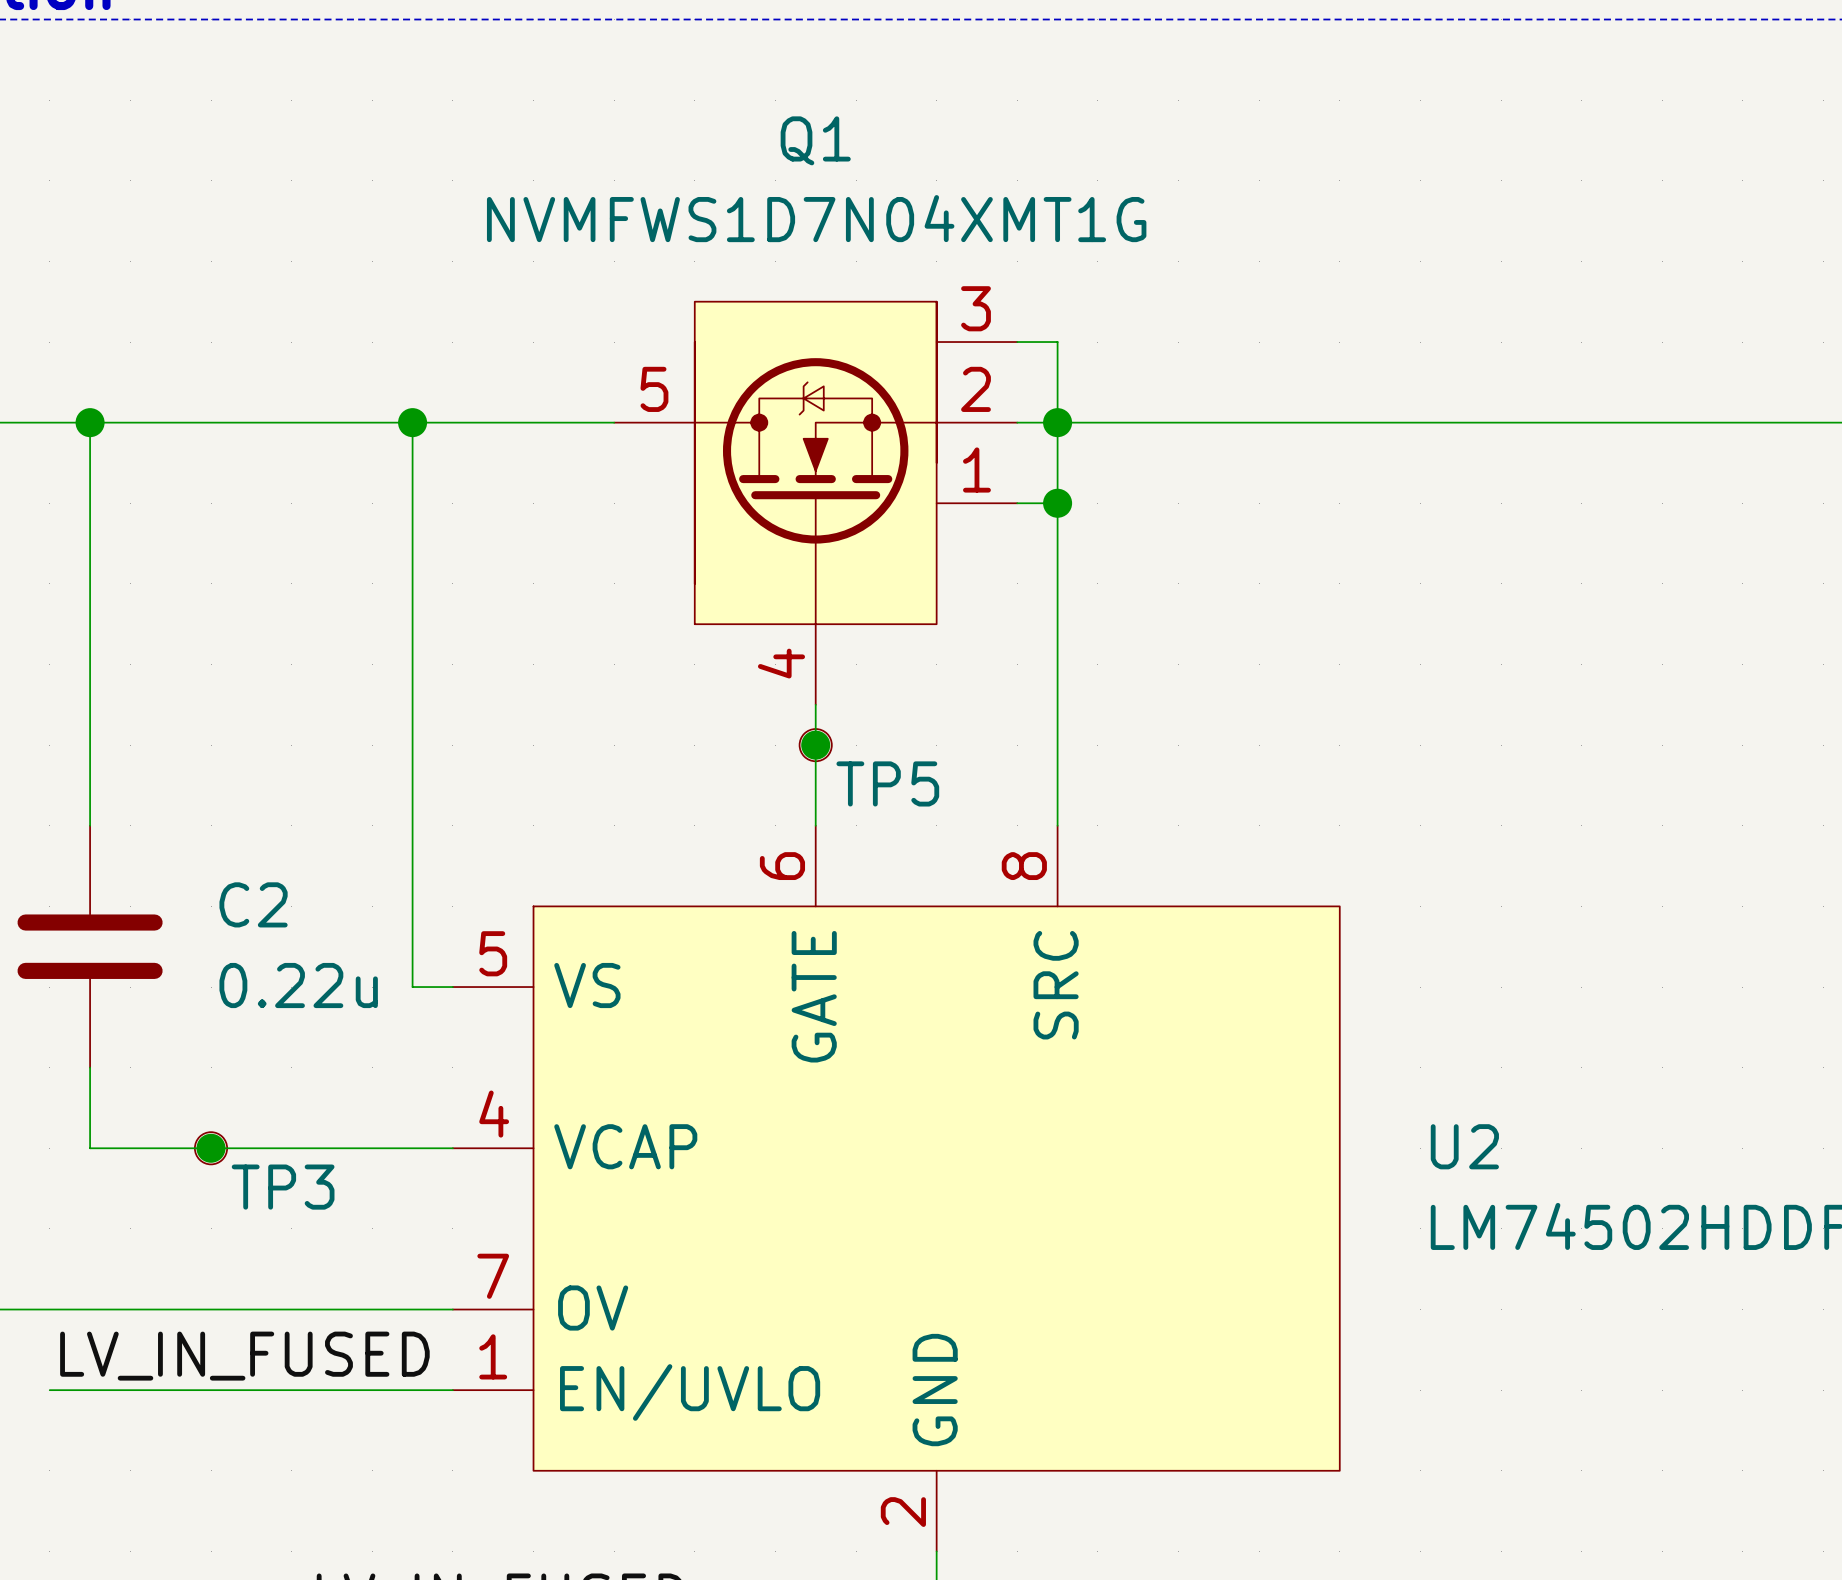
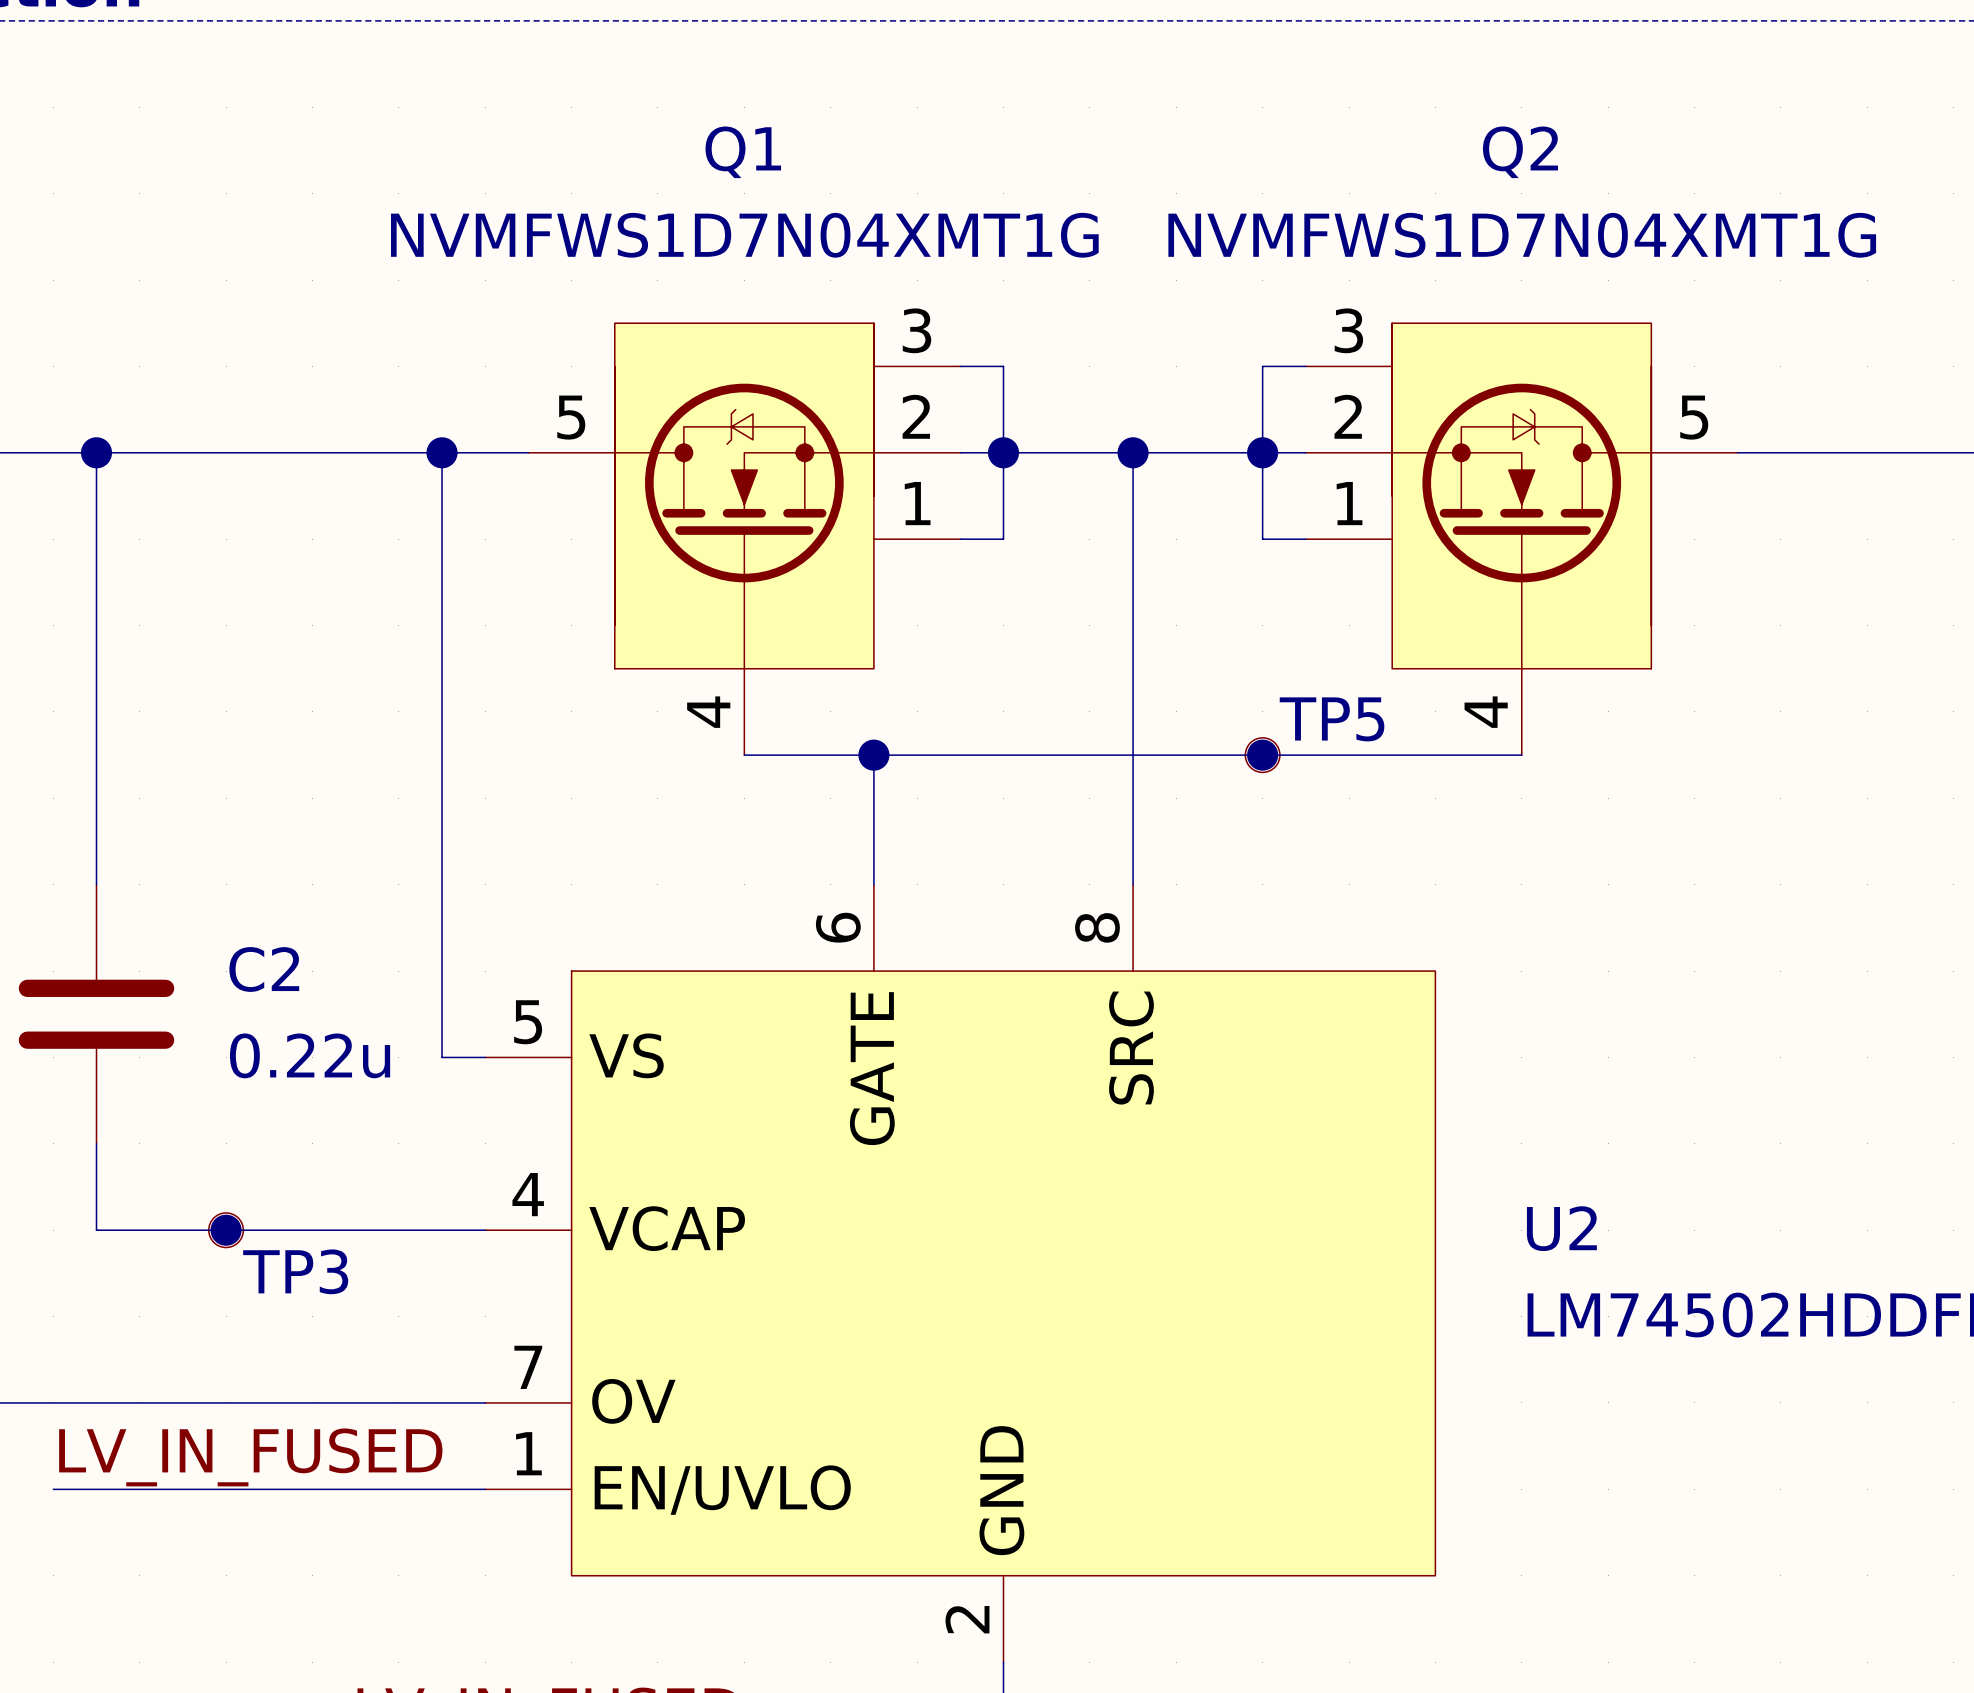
wire: (1017, 342) (1057, 342) (1057, 422) -> none
wire: none -> (1305, 366) (1262, 366) (1262, 539) (1305, 539)
junction: none -> (1003, 452)
junction: none -> (1262, 452)
Q1 position: (815, 503) -> (744, 539)
wire: (1017, 503) (1057, 503) -> none
junction: (1057, 503) -> none
Q2: none -> NVMFWS1D7N04XMT1G (1521, 539)
wire: none -> (744, 755) (1521, 755)
junction: none -> (1262, 755)
junction position: (815, 745) -> (873, 755)
TP5 position: (815, 745) -> (1262, 755)
TP5 name position: TP5 (887, 783) -> TP5 (1332, 719)

